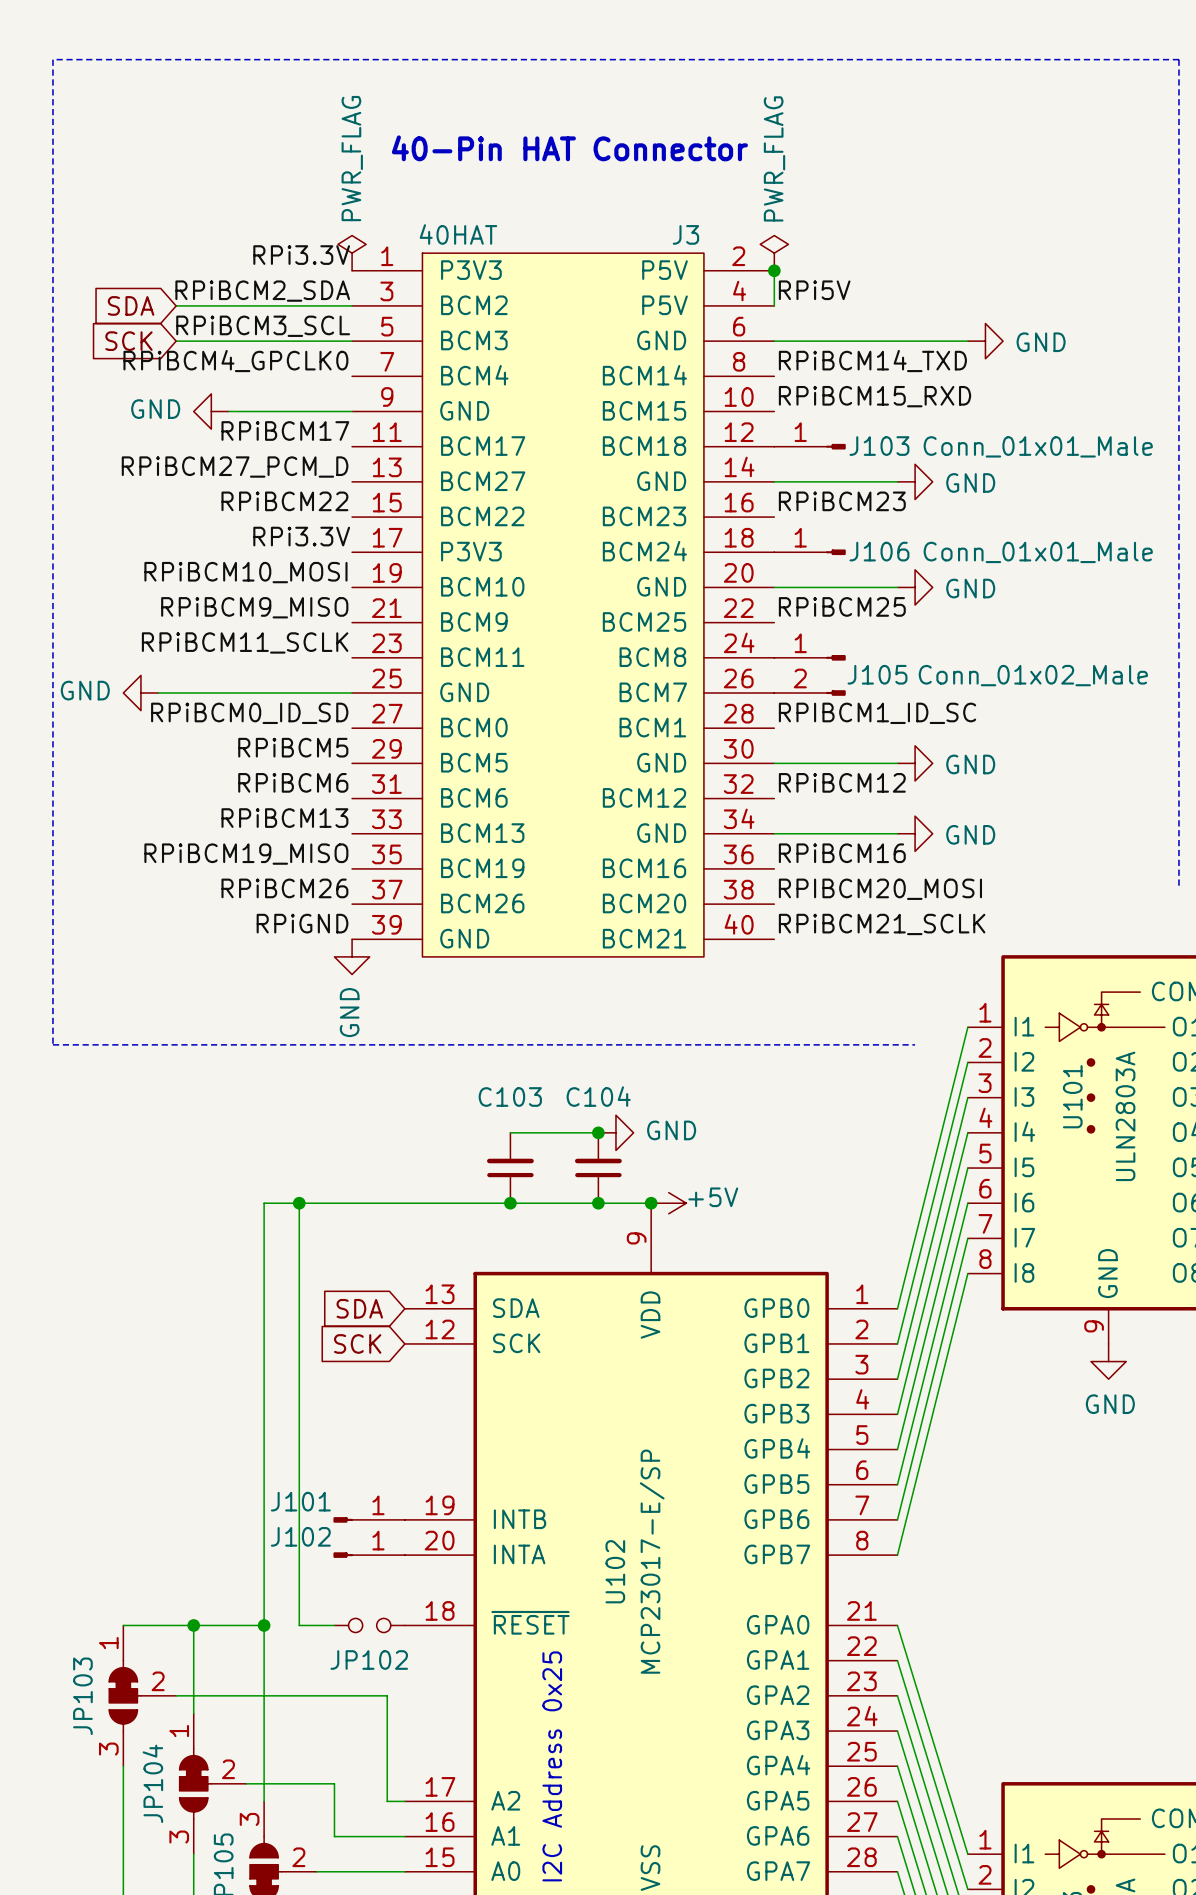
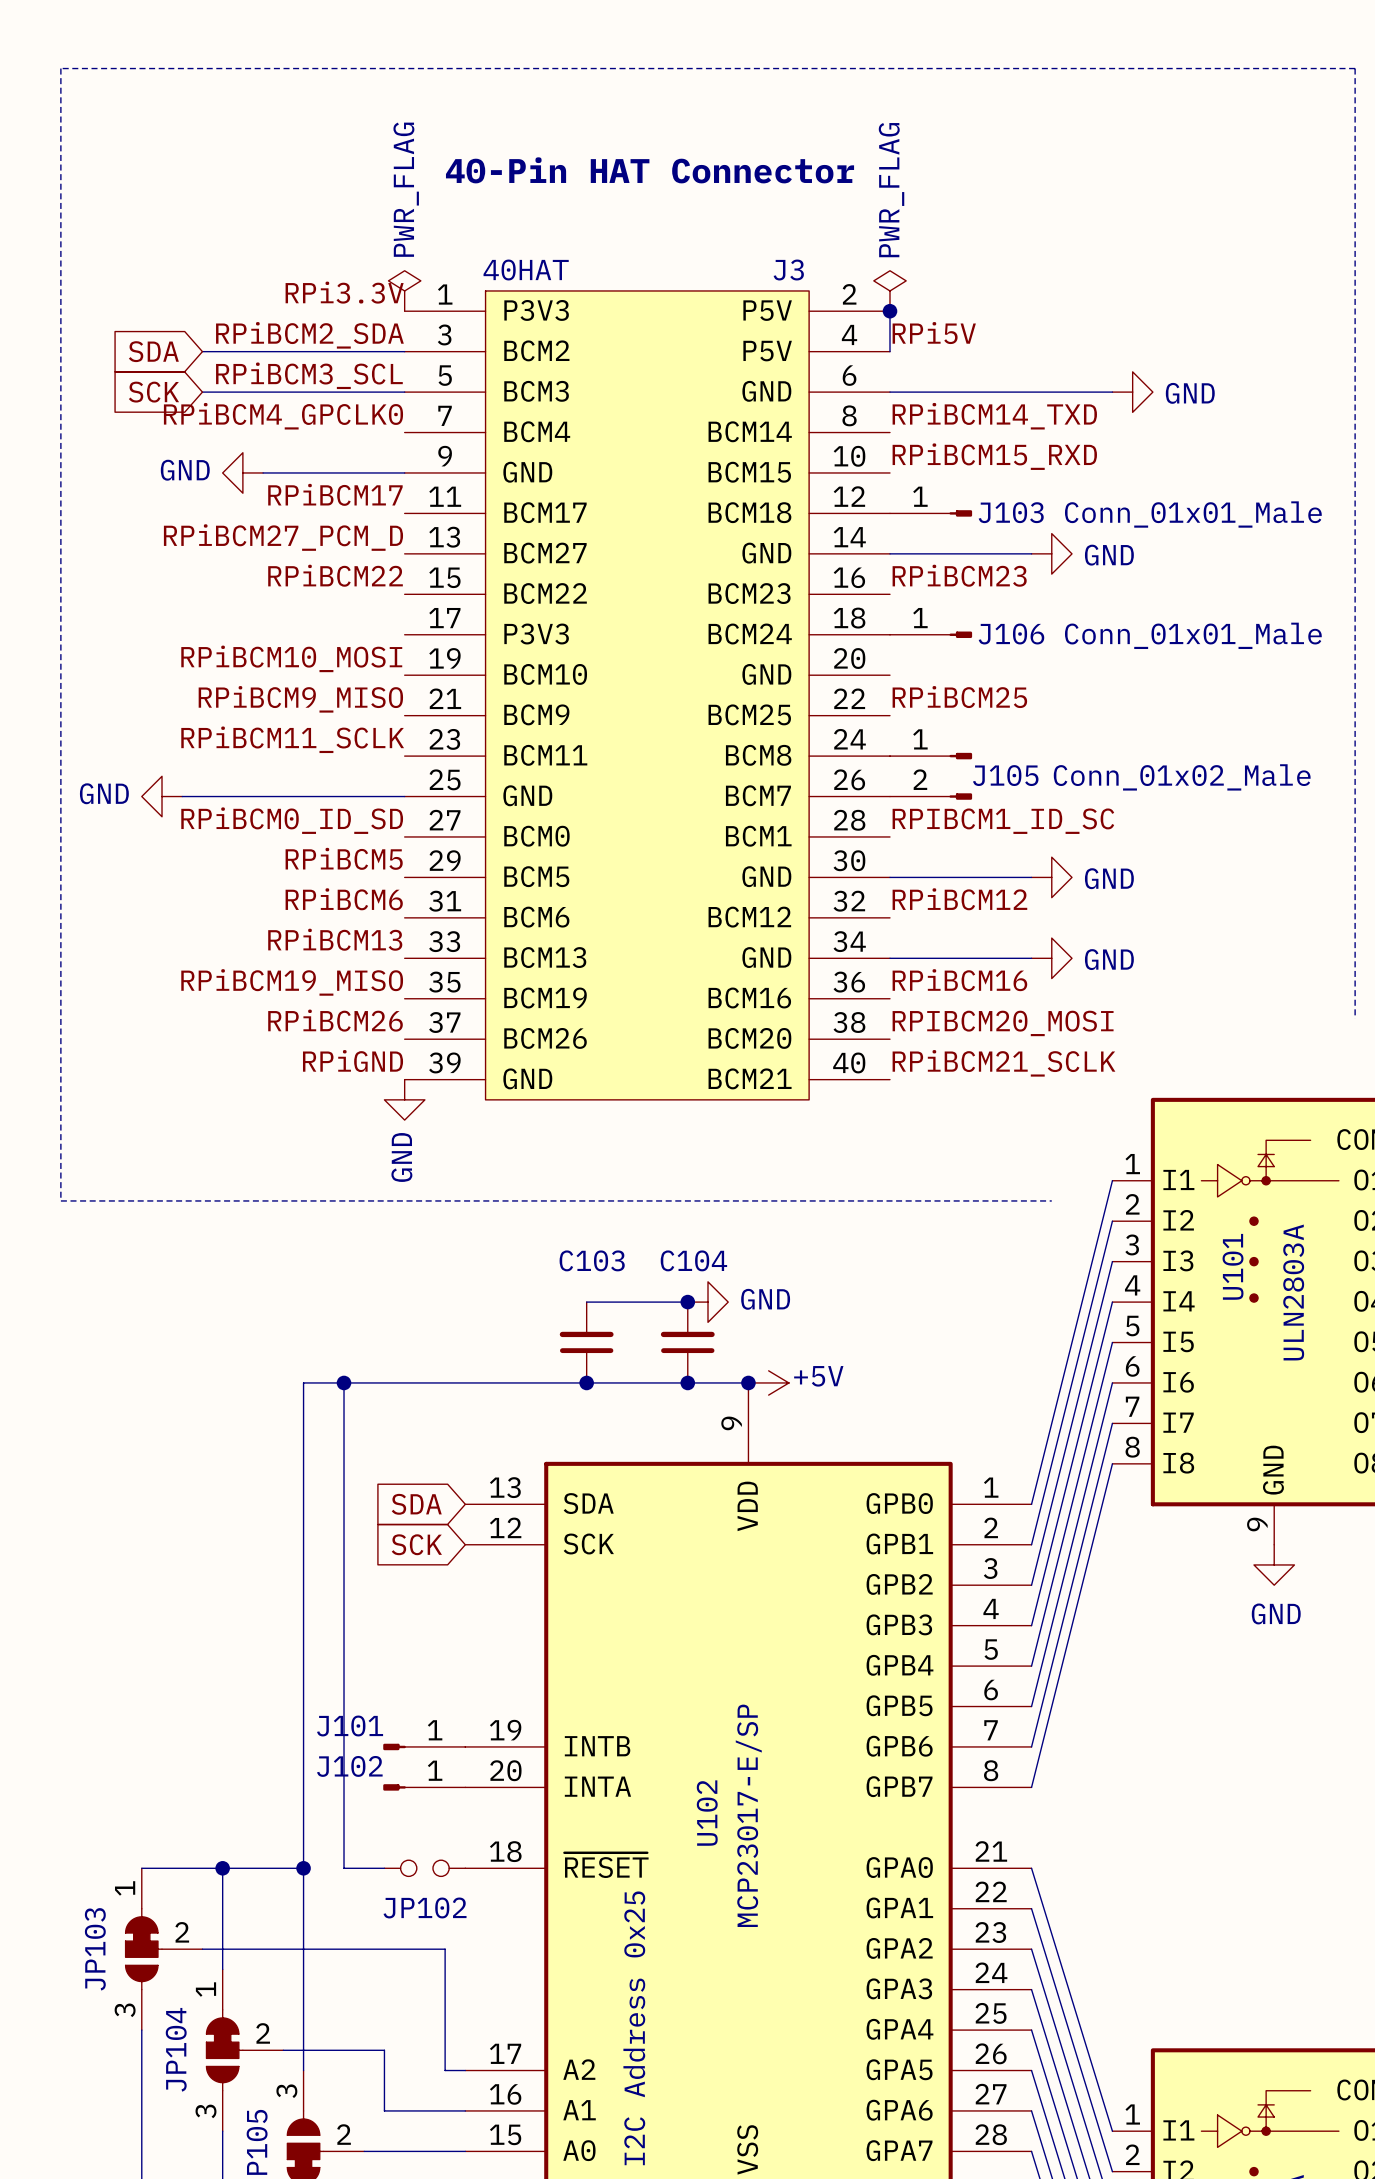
label: RPi3.3V (301, 536) -> none
wire: (774, 587) (897, 587) -> none
power symbol: GND (915, 587) -> none

